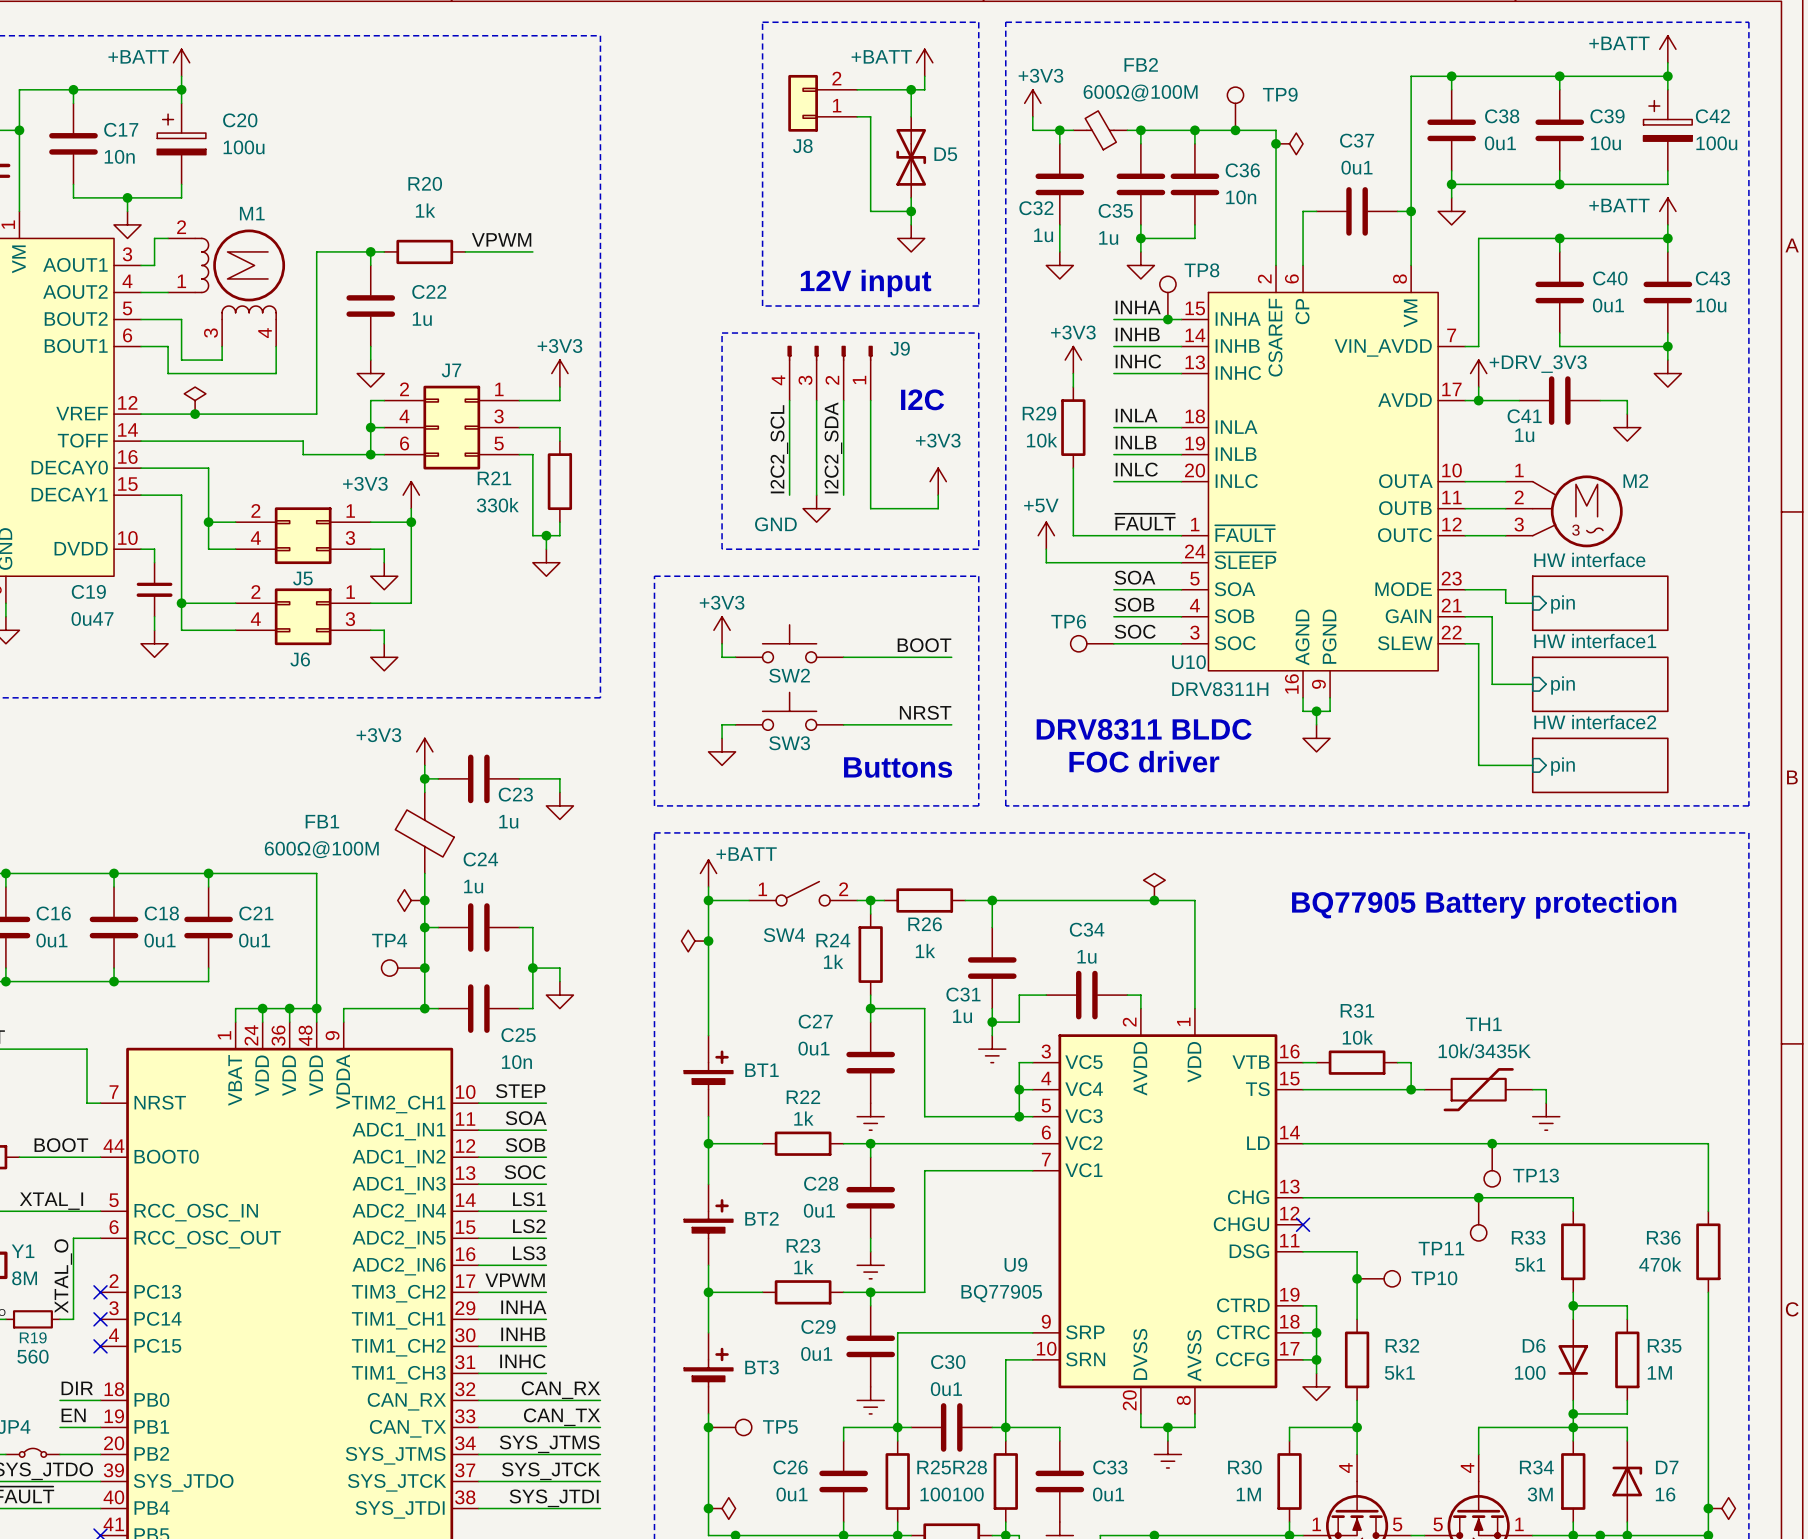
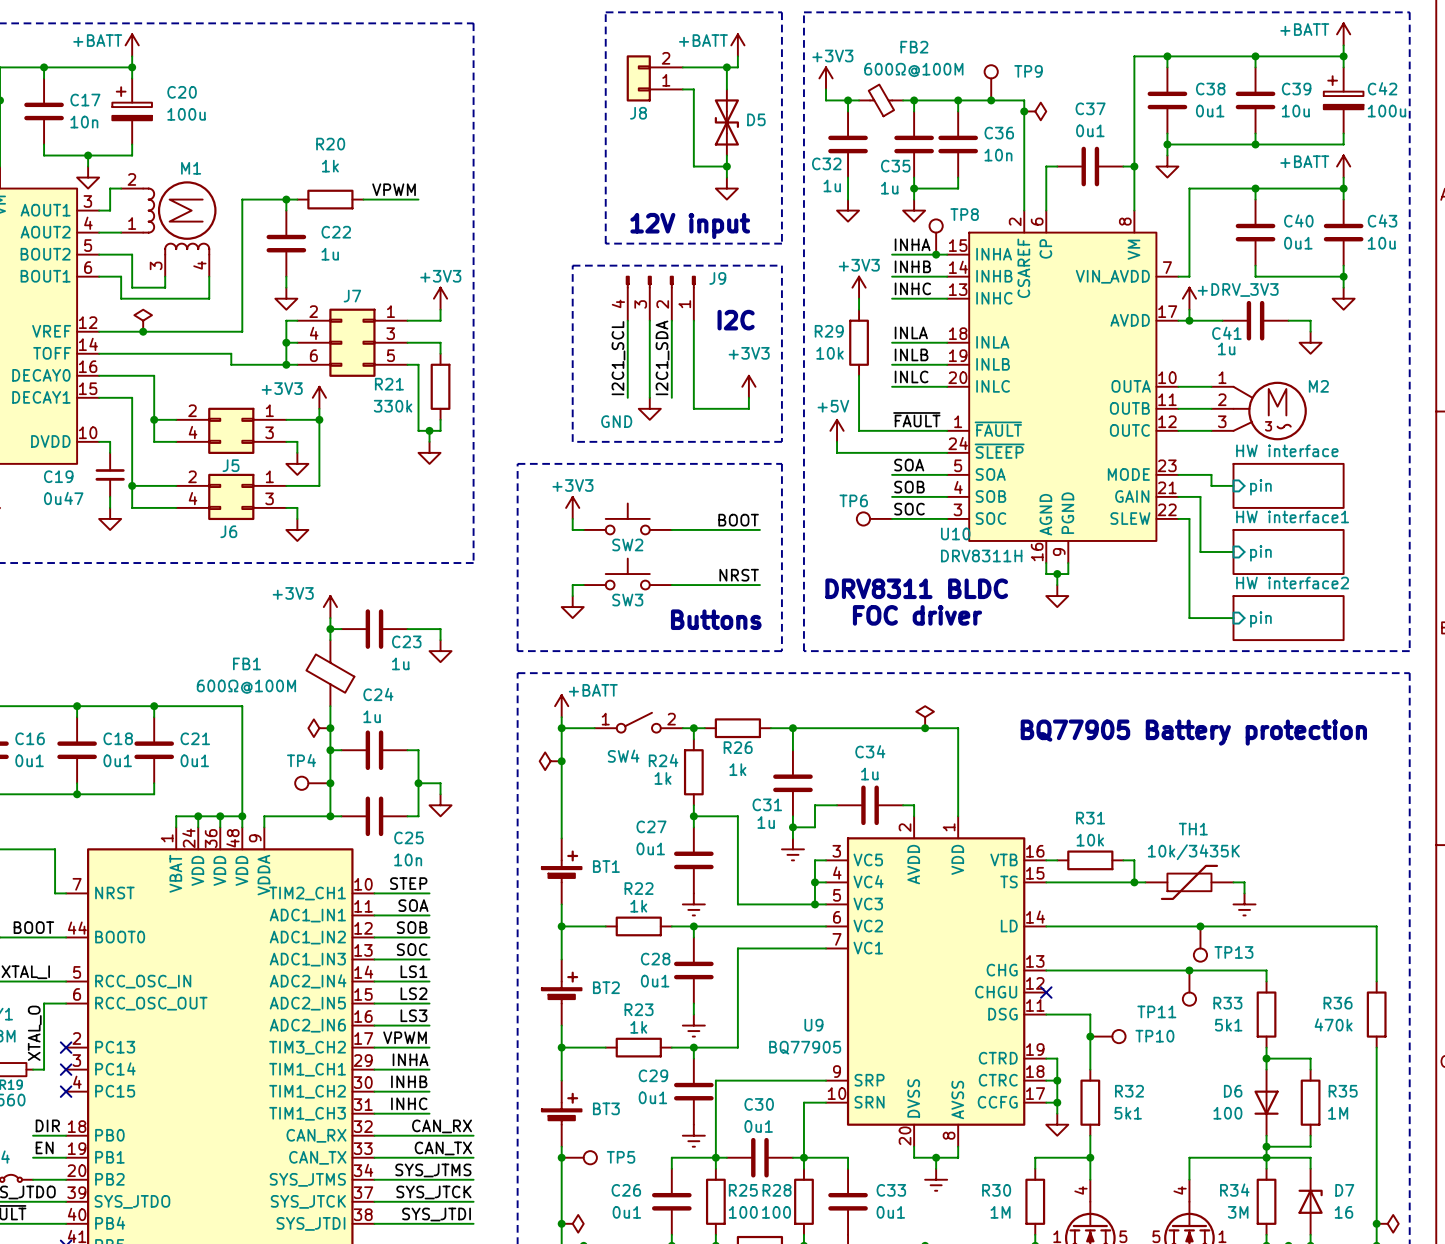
label: I2C2_SDA (833, 447) -> I2C1_SDA (662, 357)
label: I2C2_SCL (779, 449) -> I2C1_SCL (618, 358)

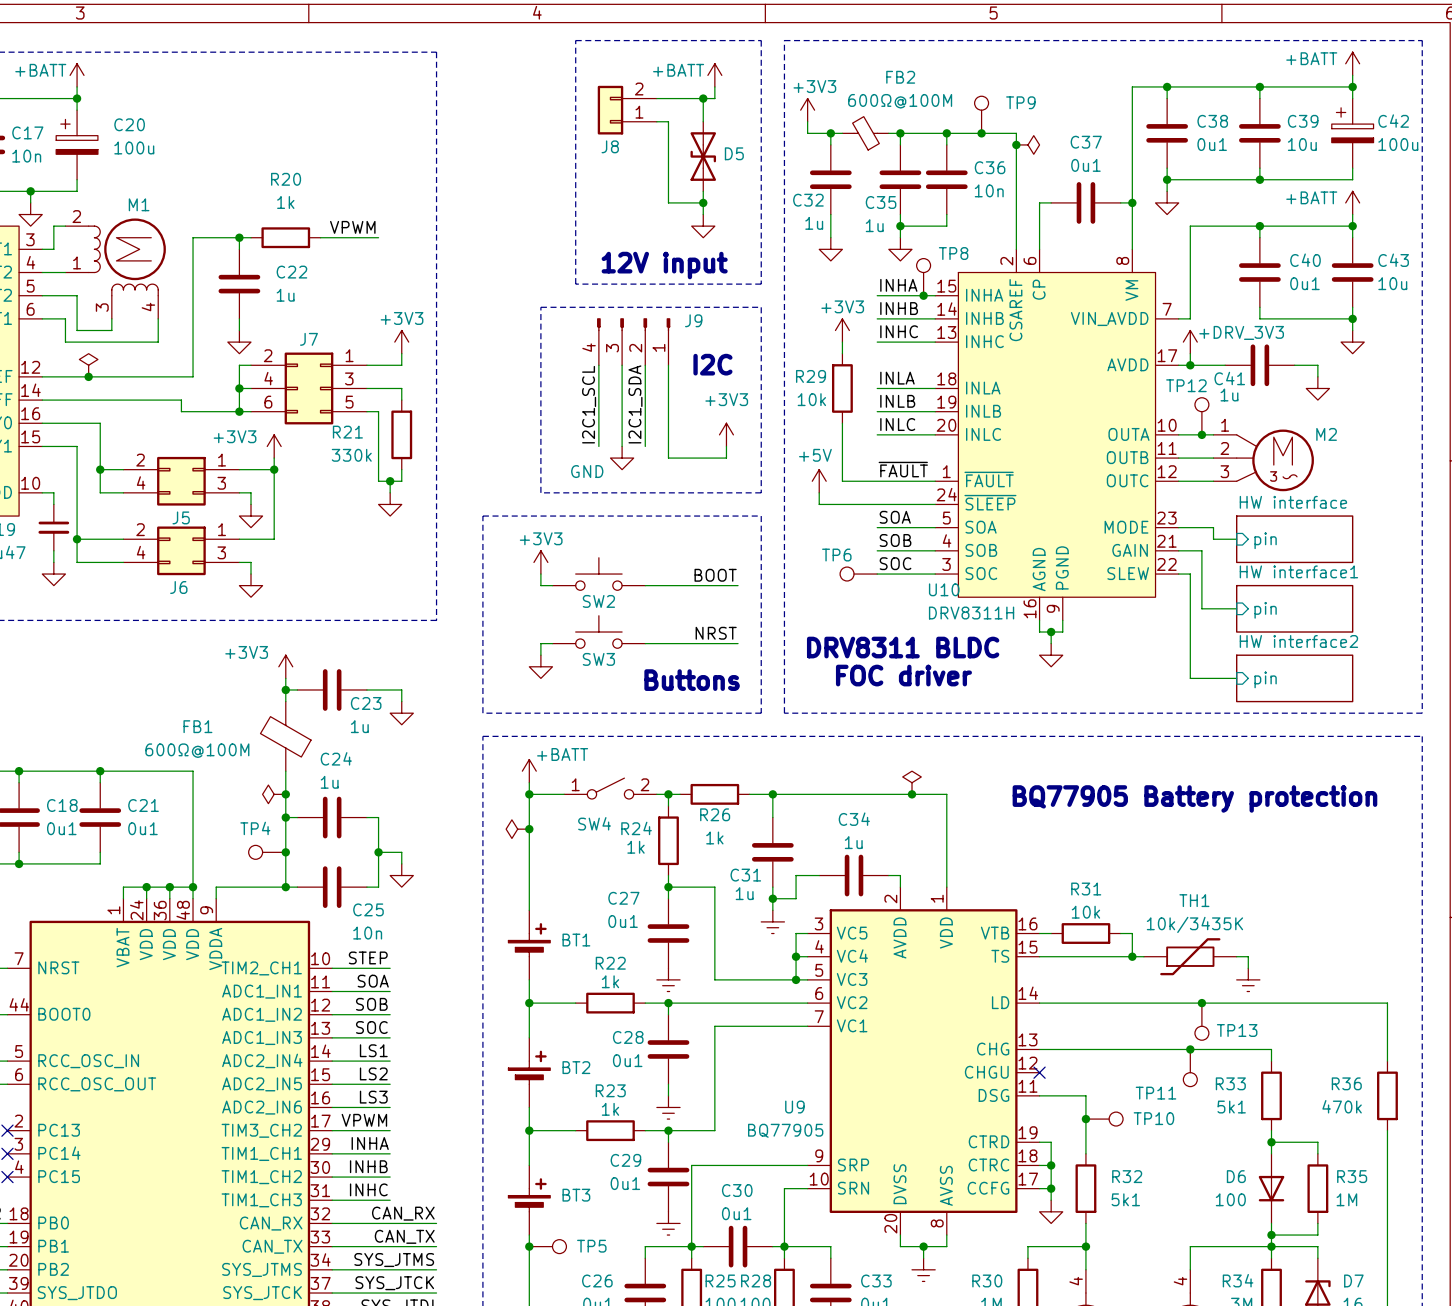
TP12: none -> (1201, 416)
junction: none -> (1201, 434)

